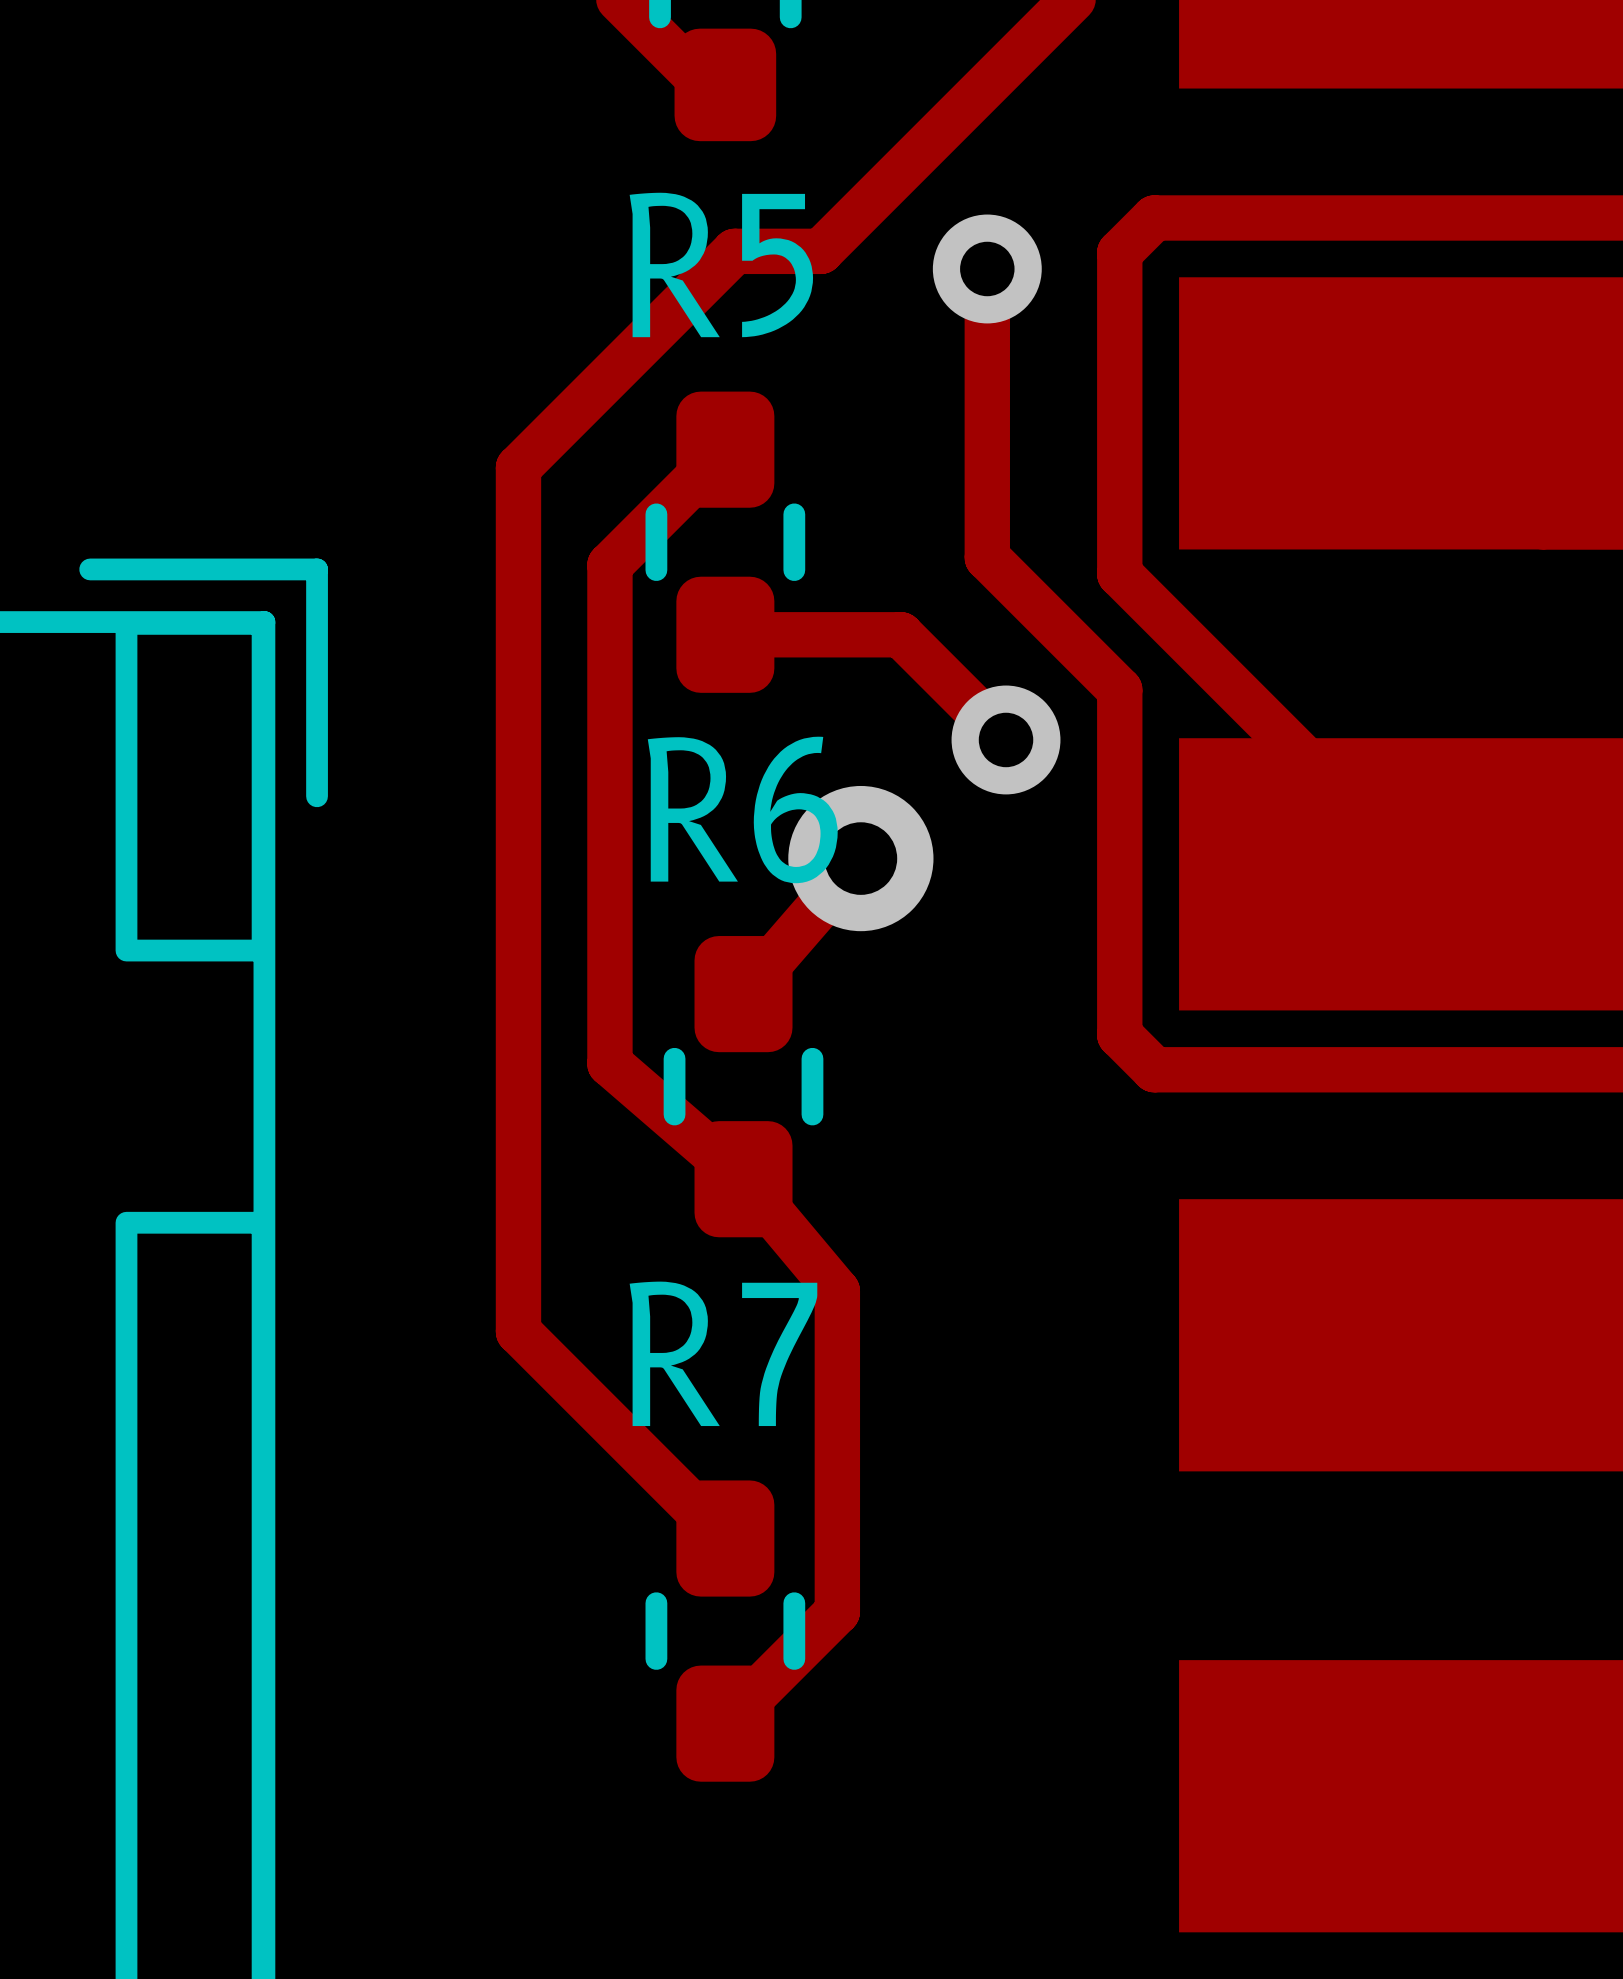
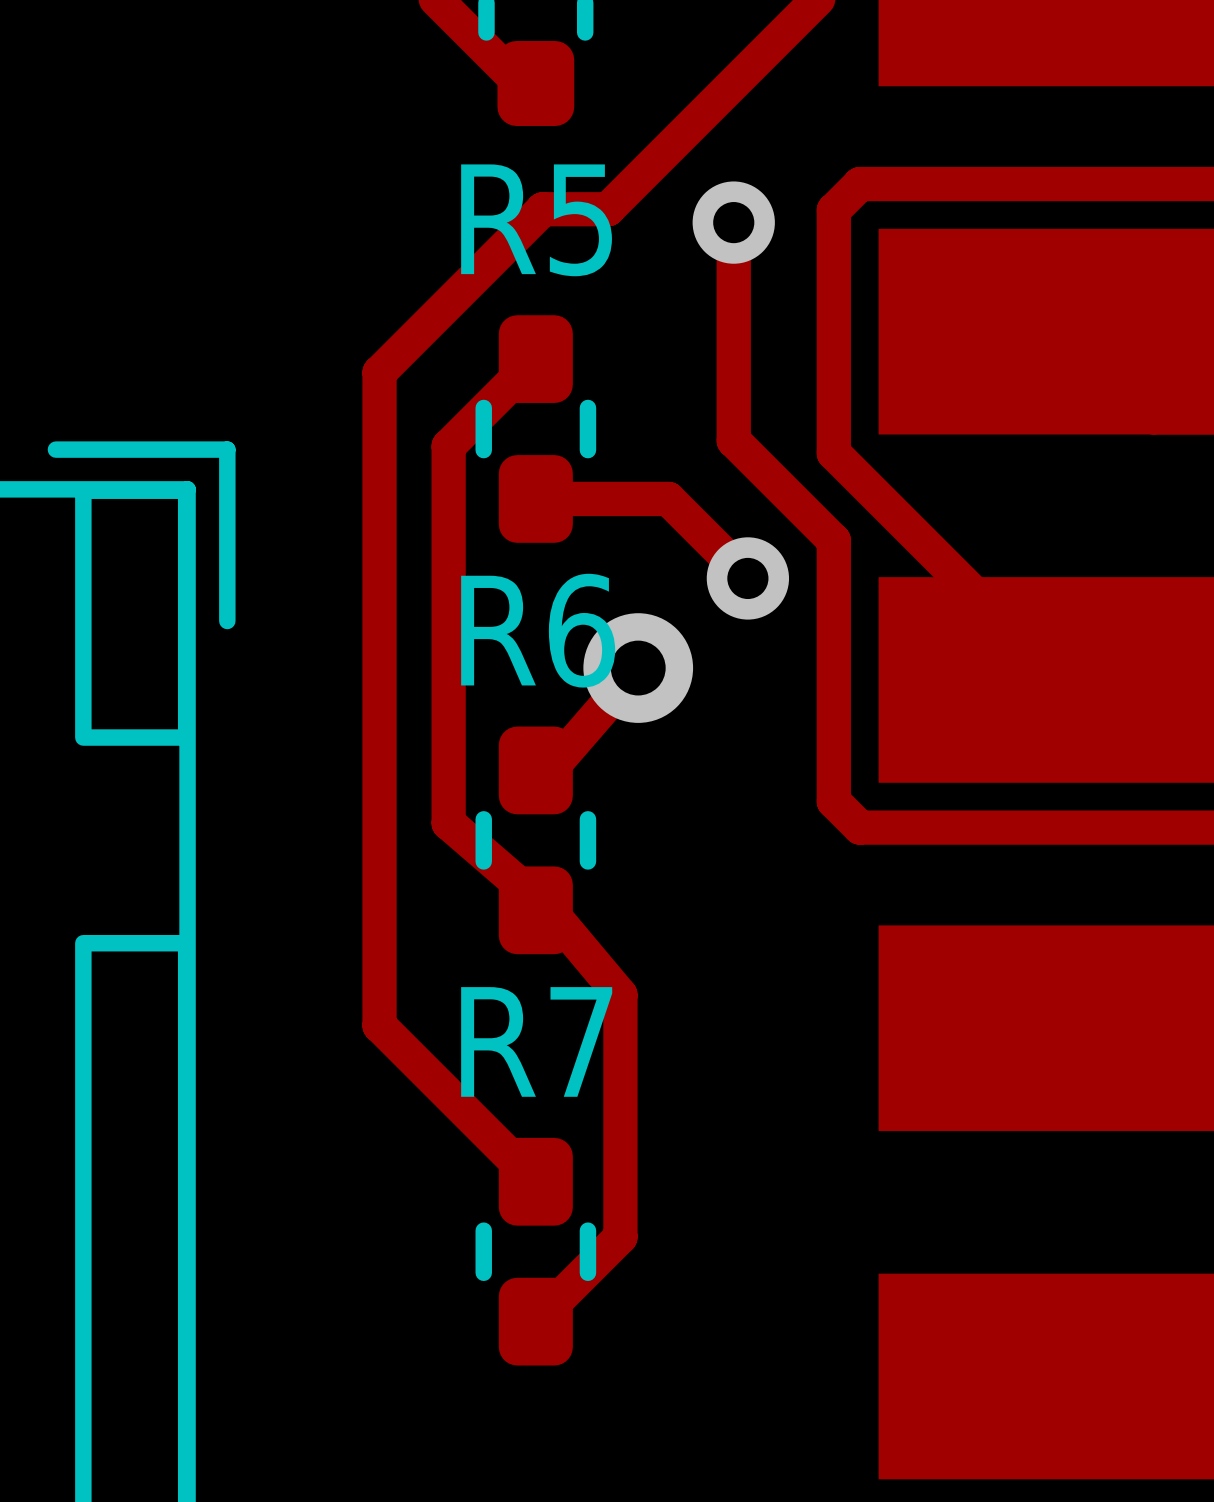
R6 position: (743, 1086) -> (535, 840)

